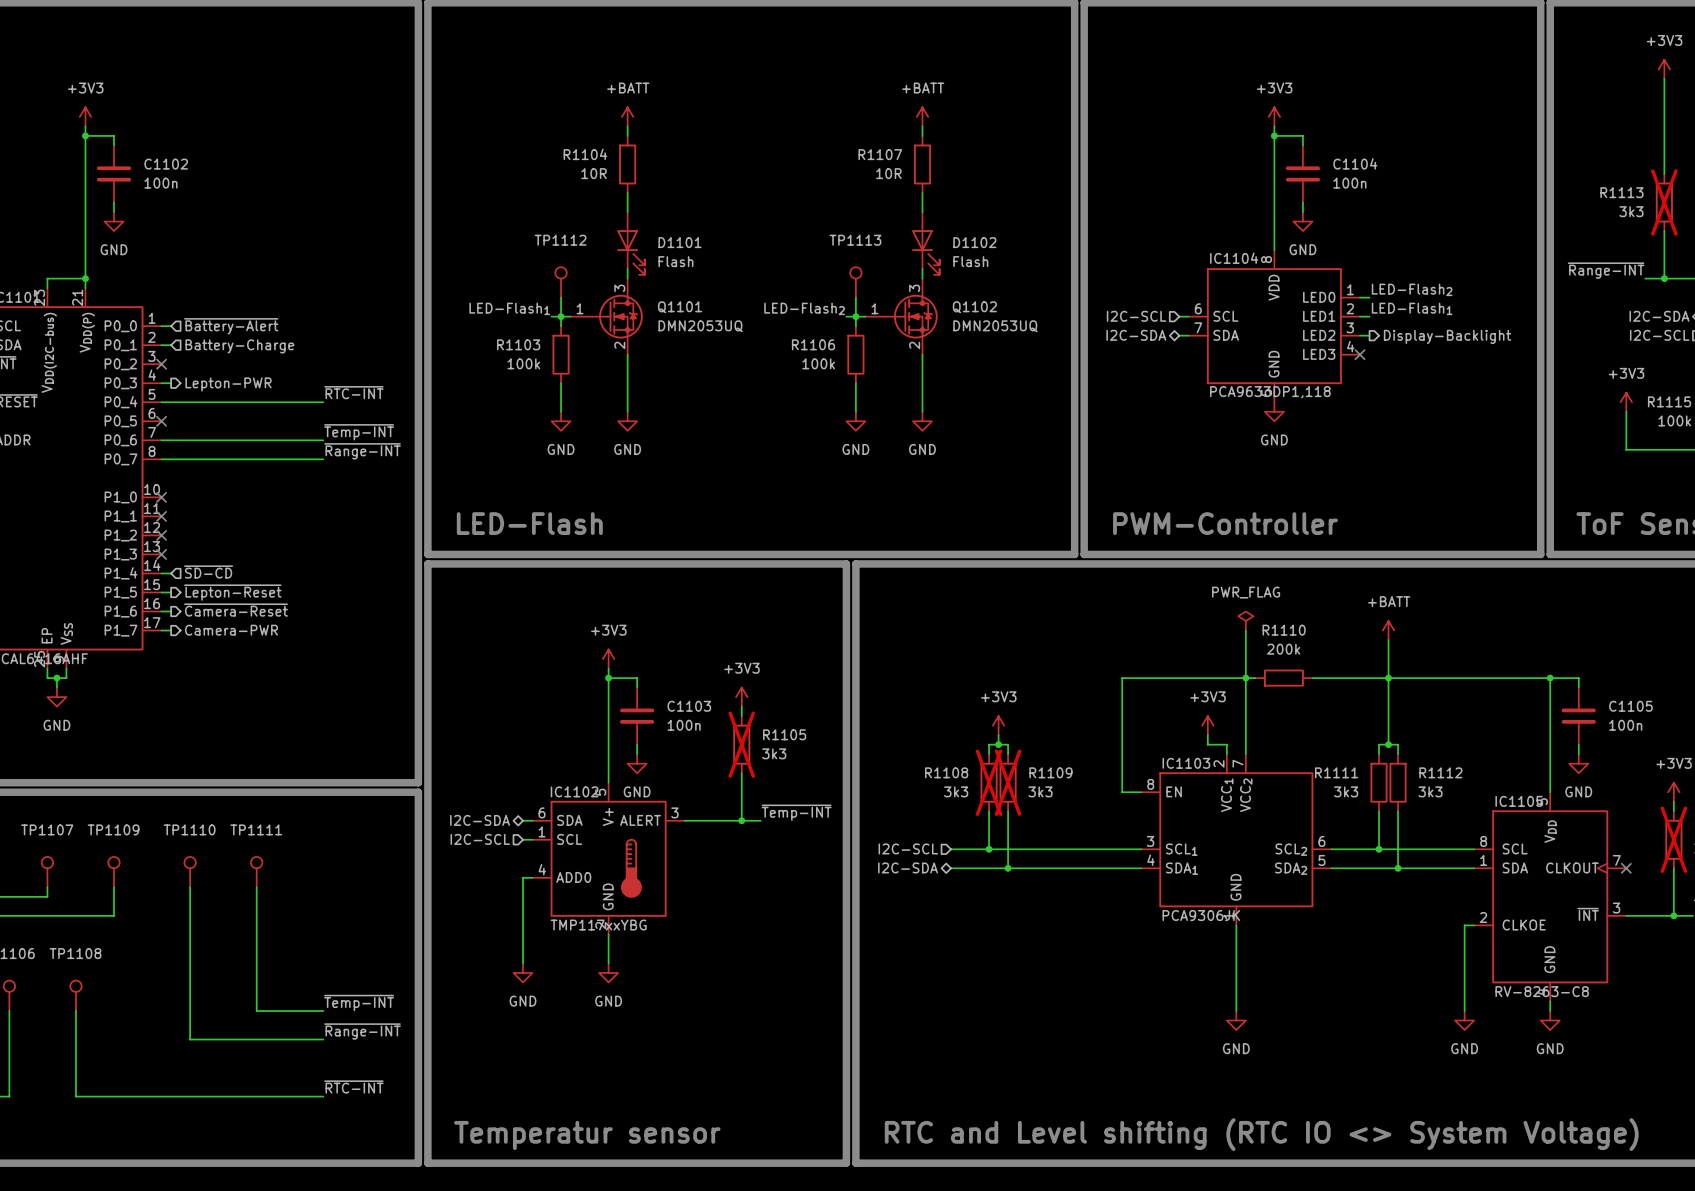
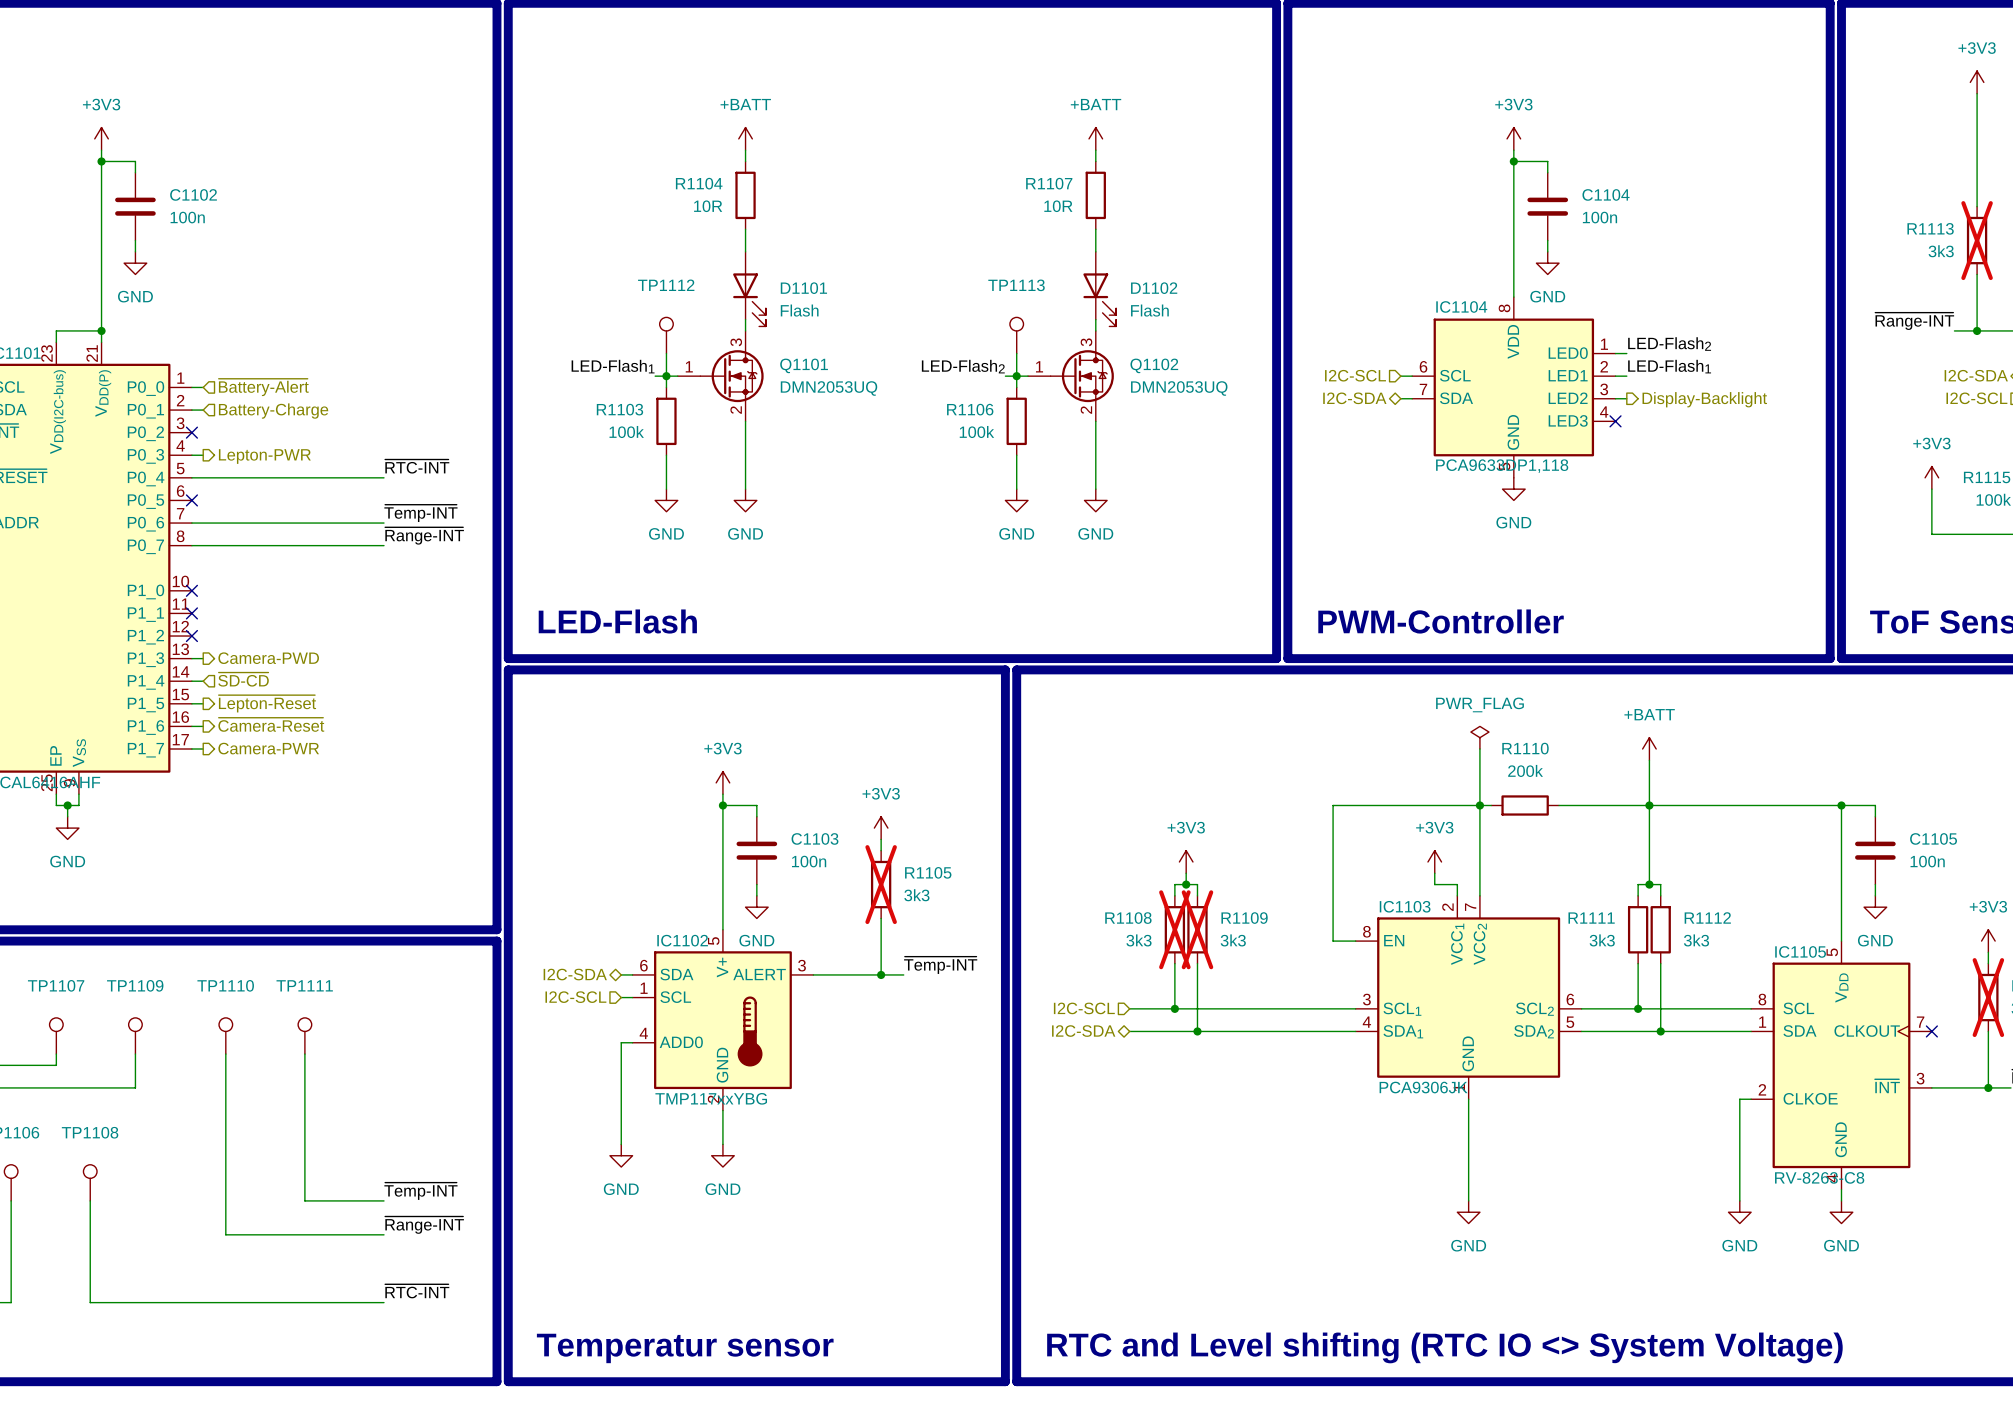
wire: none -> (191, 658) (203, 658)
no-connect mark: (161, 554) -> none
hierarchical label: none -> Camera-PWD (268, 658)

